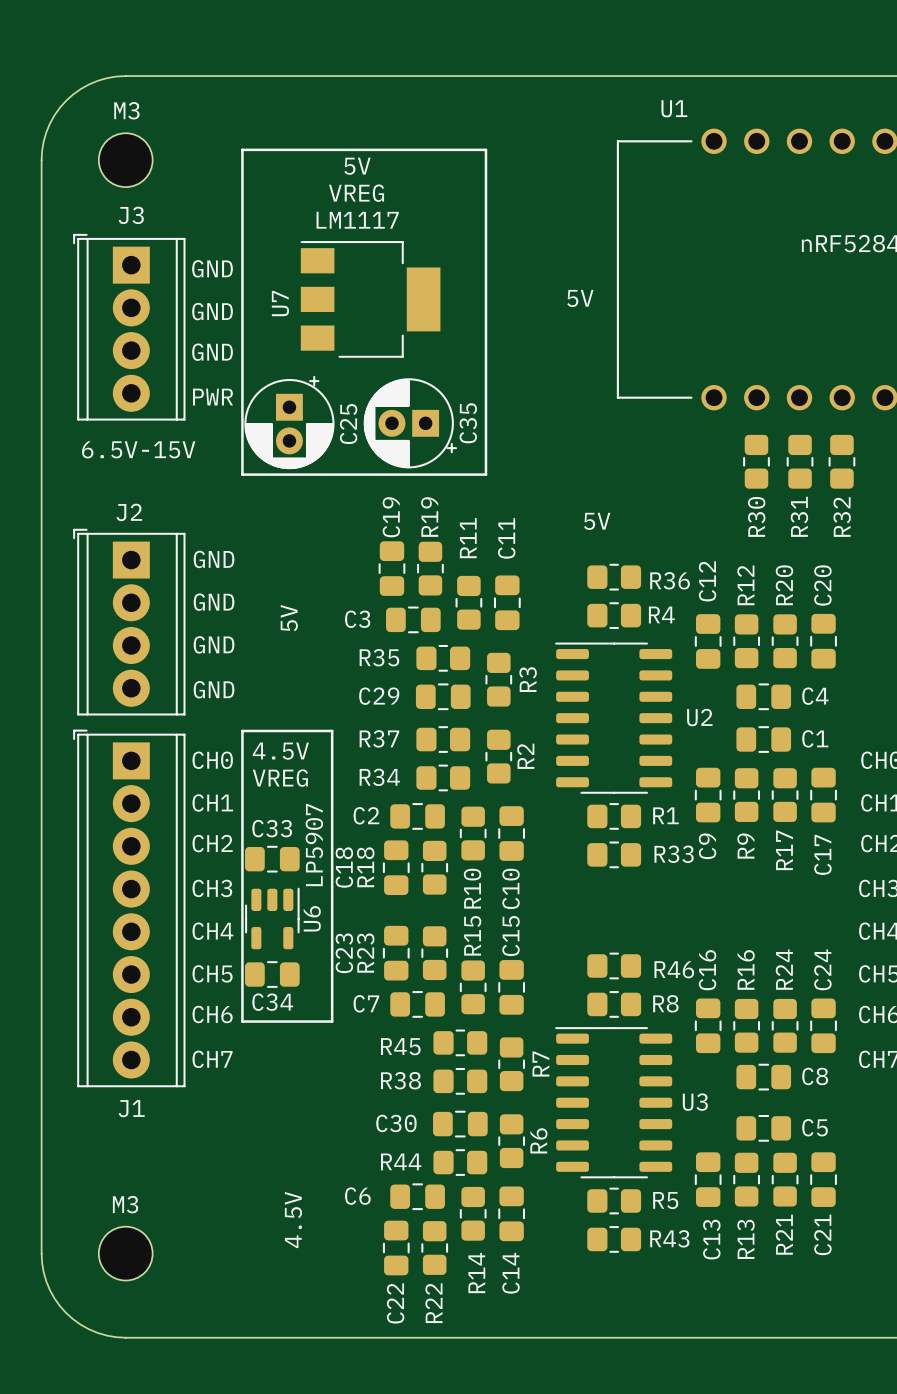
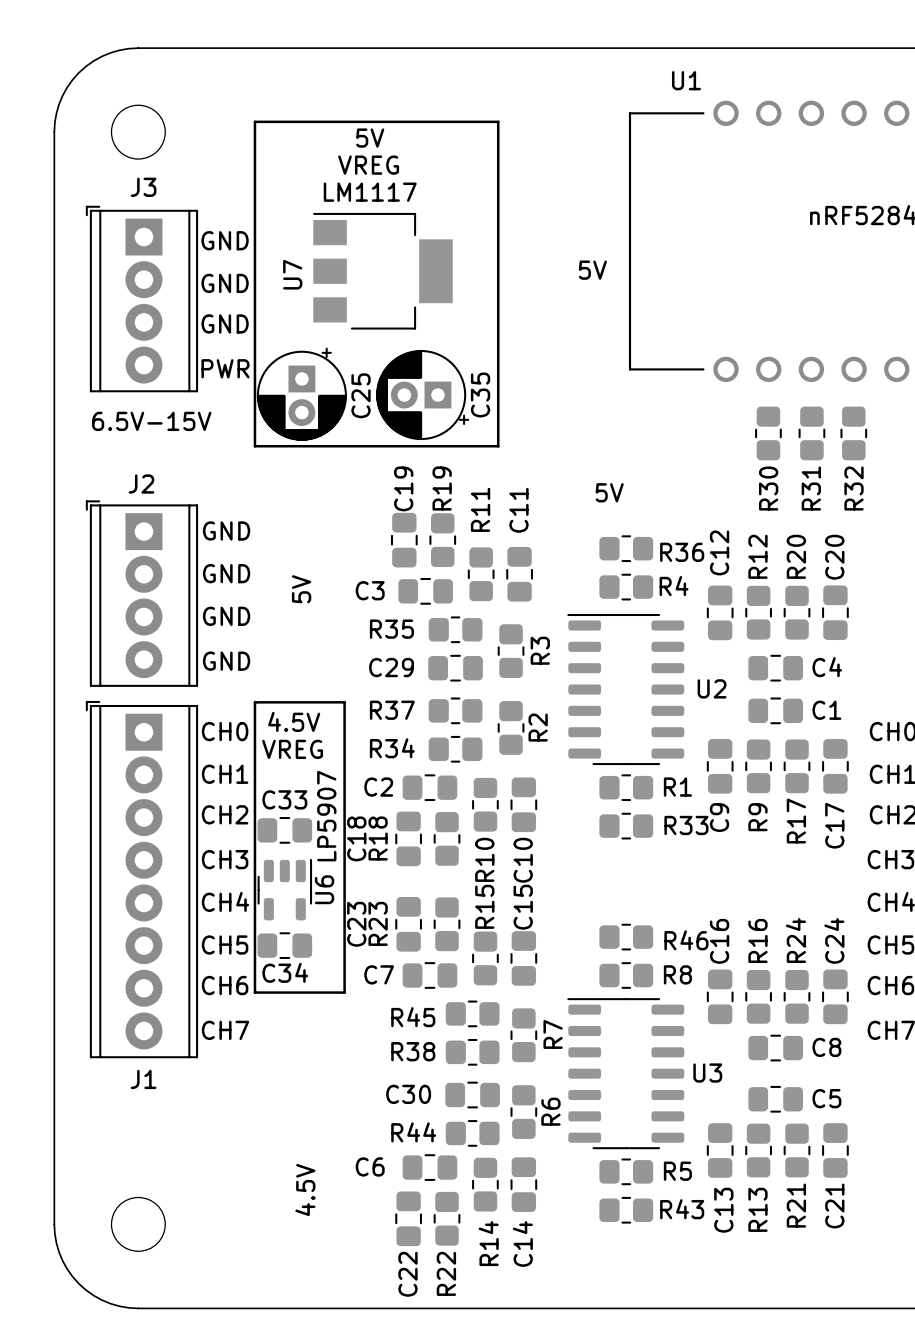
M3 name: M3 (126, 110) -> none
M3 name: M3 (125, 1204) -> none

